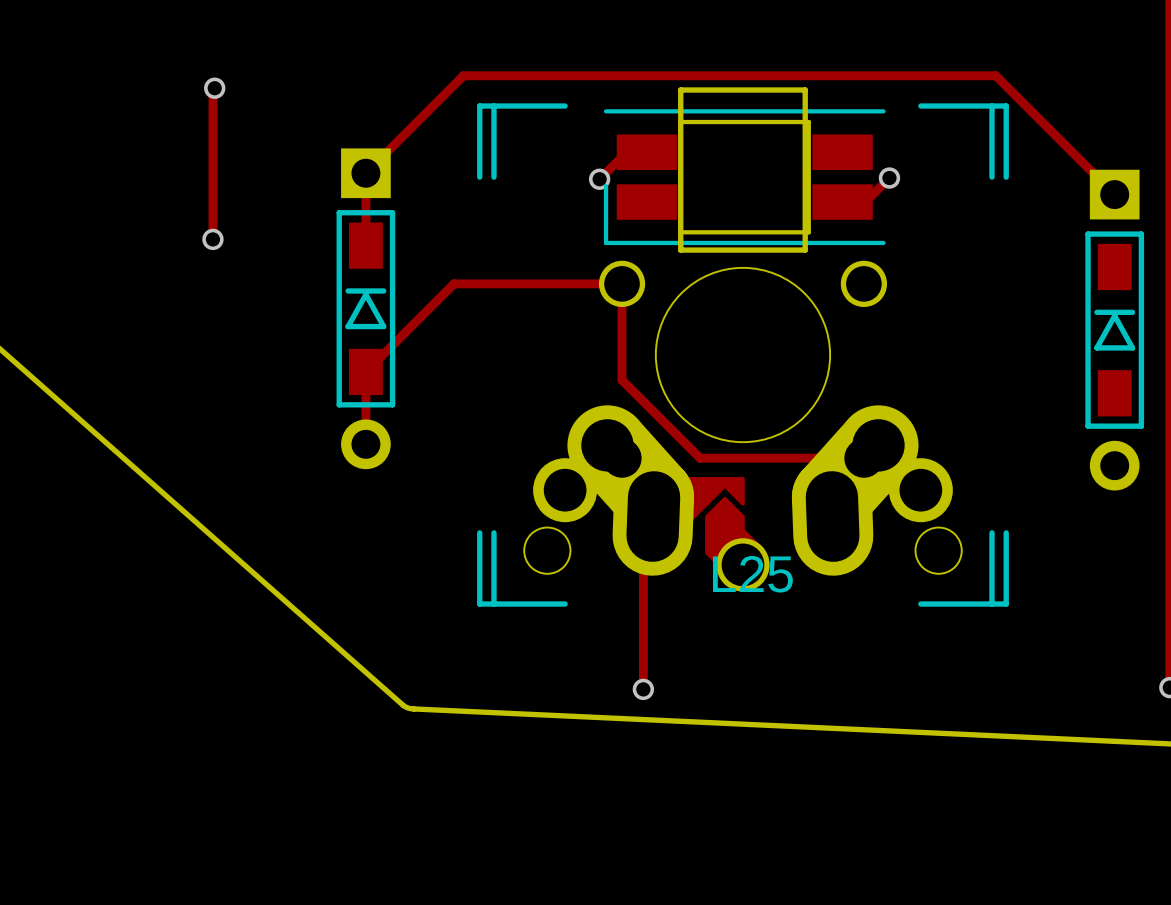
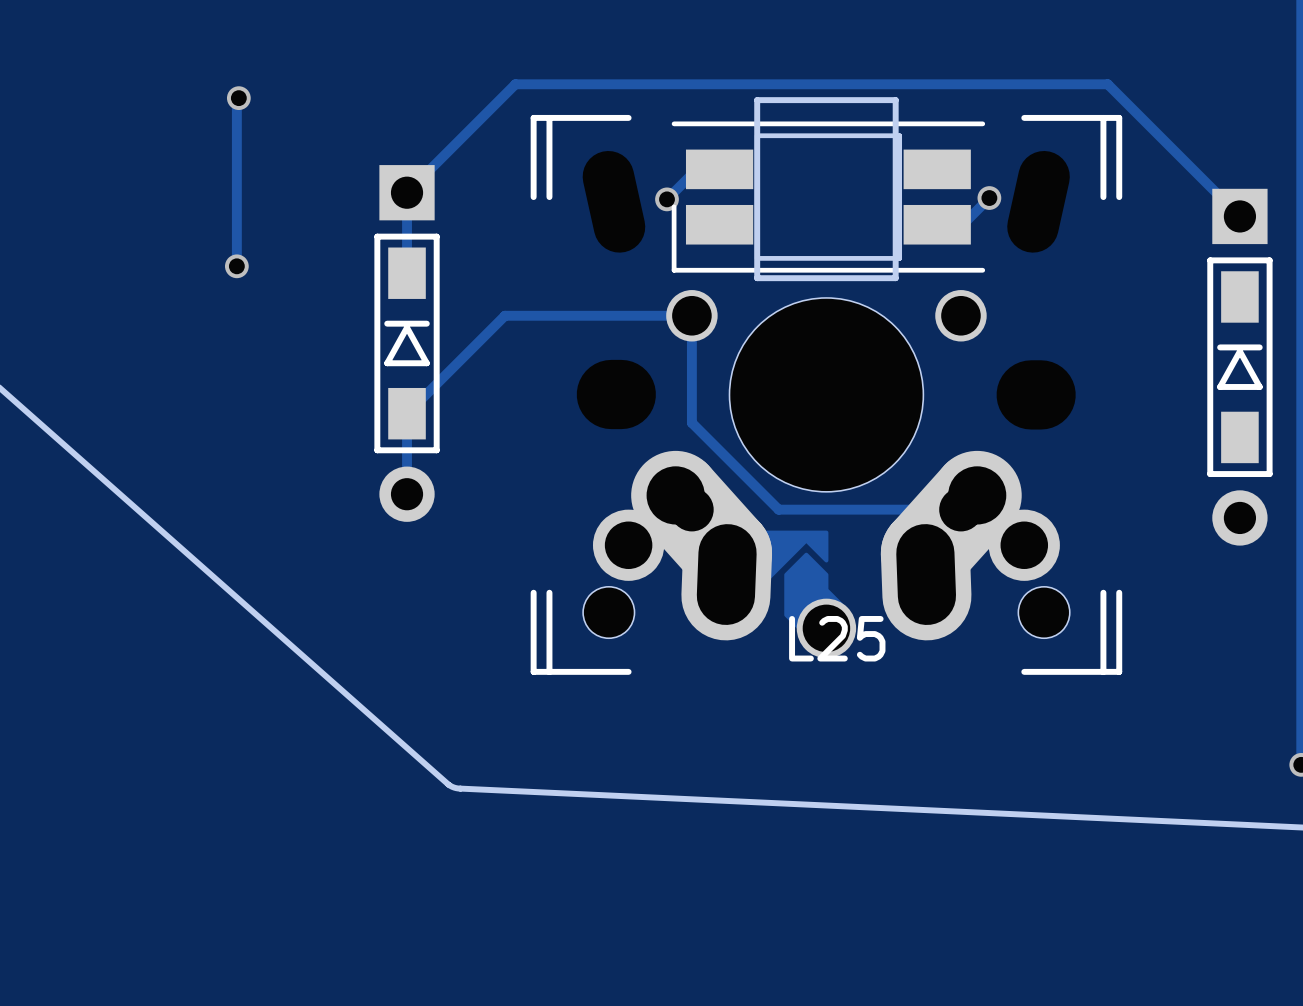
track: (653, 516) (643, 526) (643, 689) -> none
via: (643, 689) -> none

